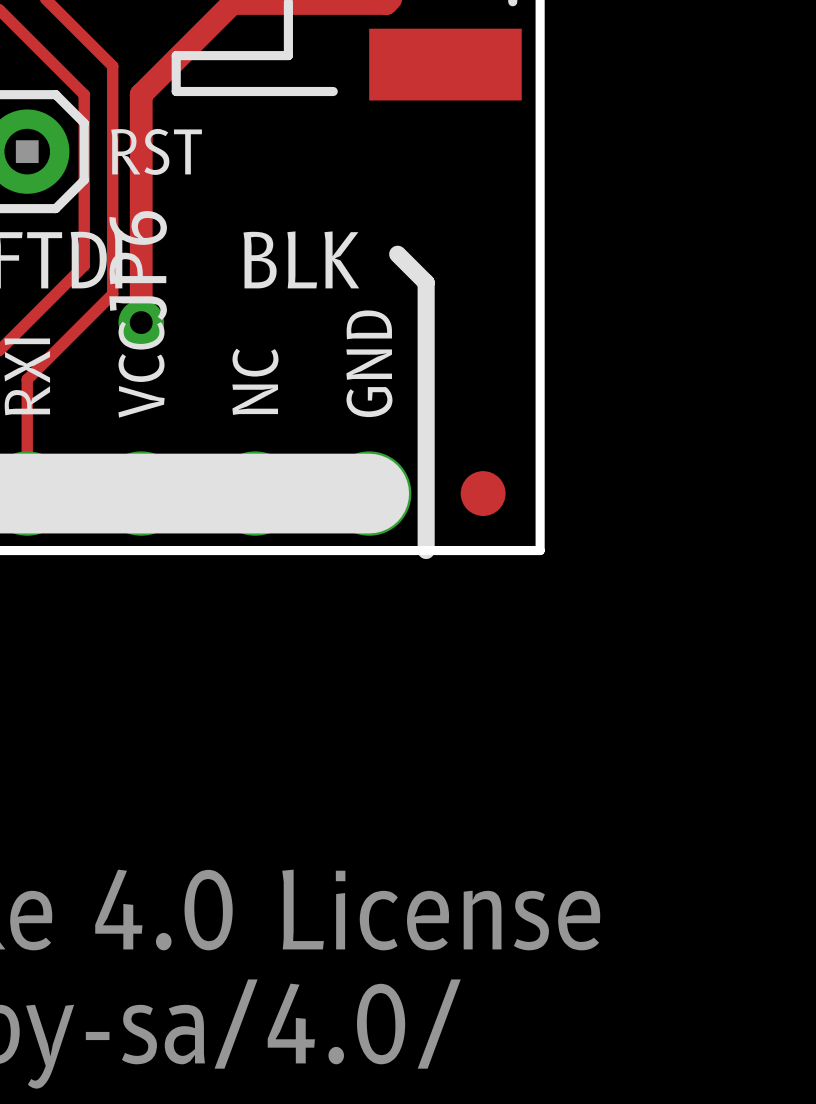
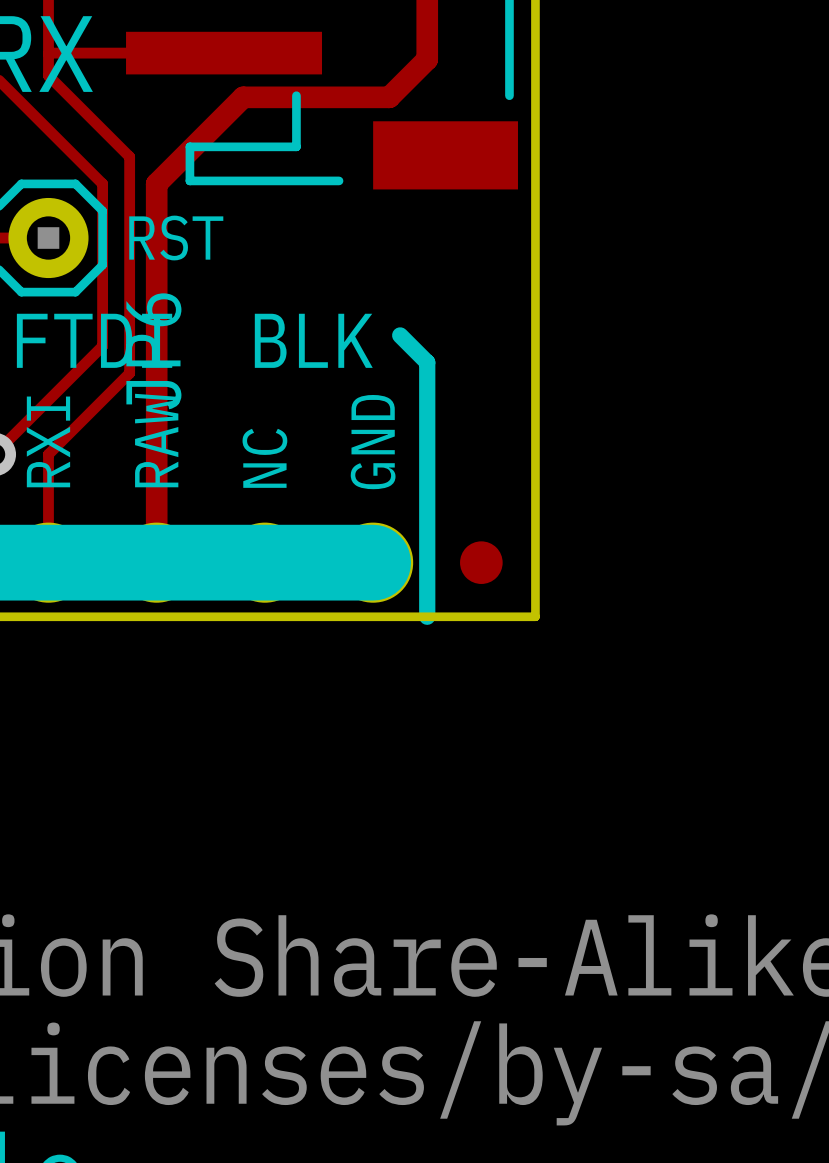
track: none -> (156, 400) (156, 562)
via: (141, 322) -> none
text: VCC (141, 369) -> RAW (156, 440)

